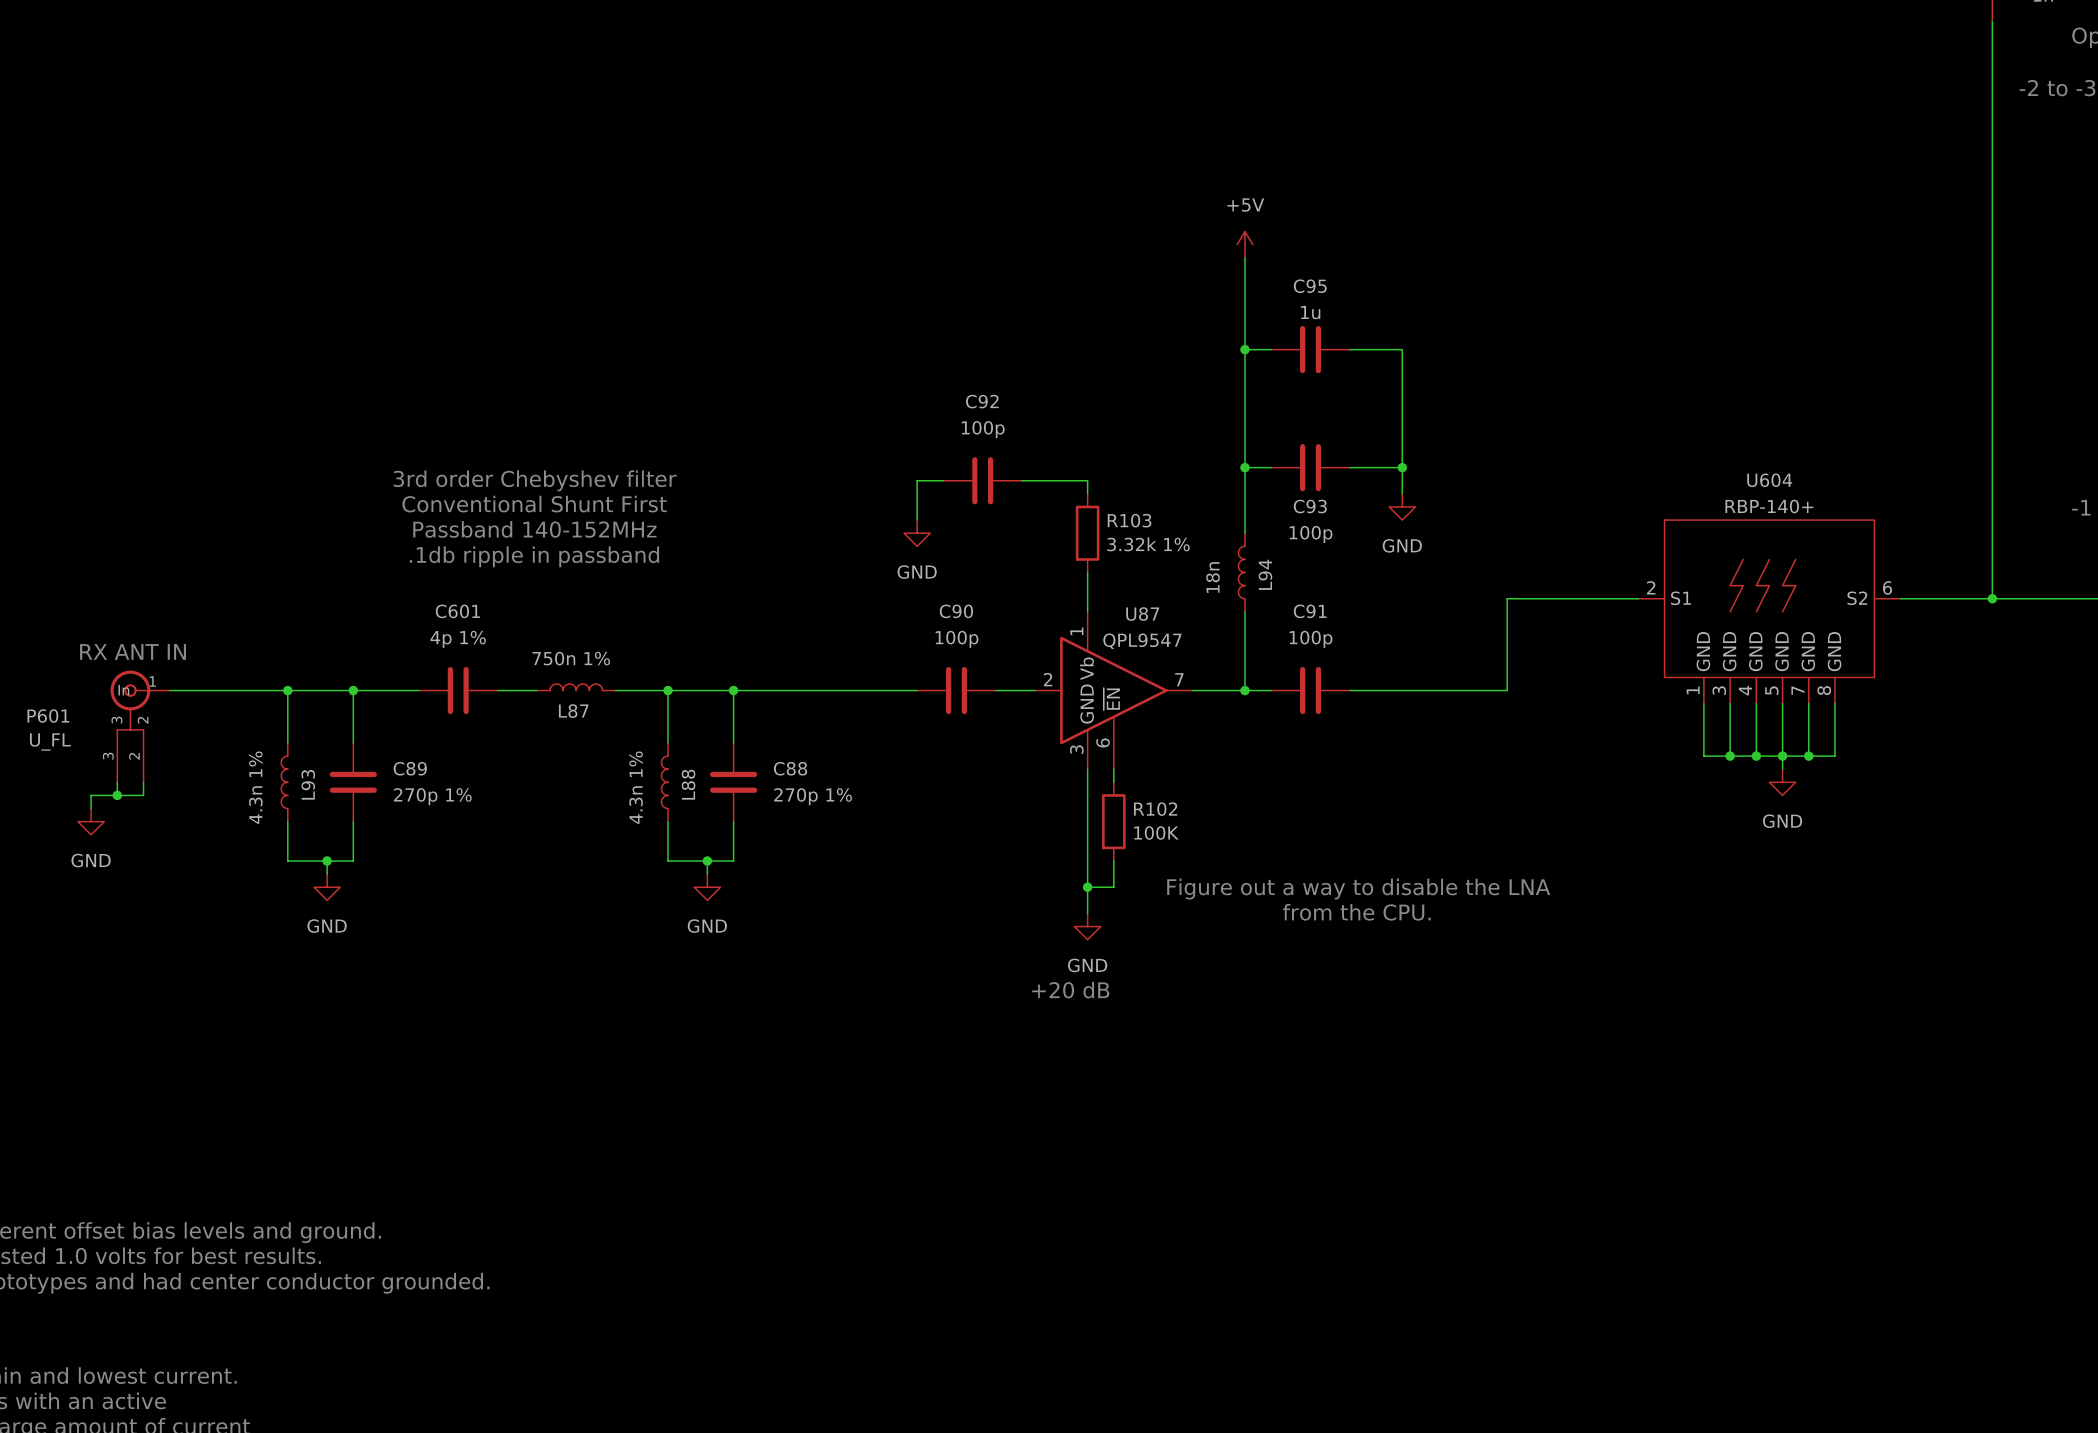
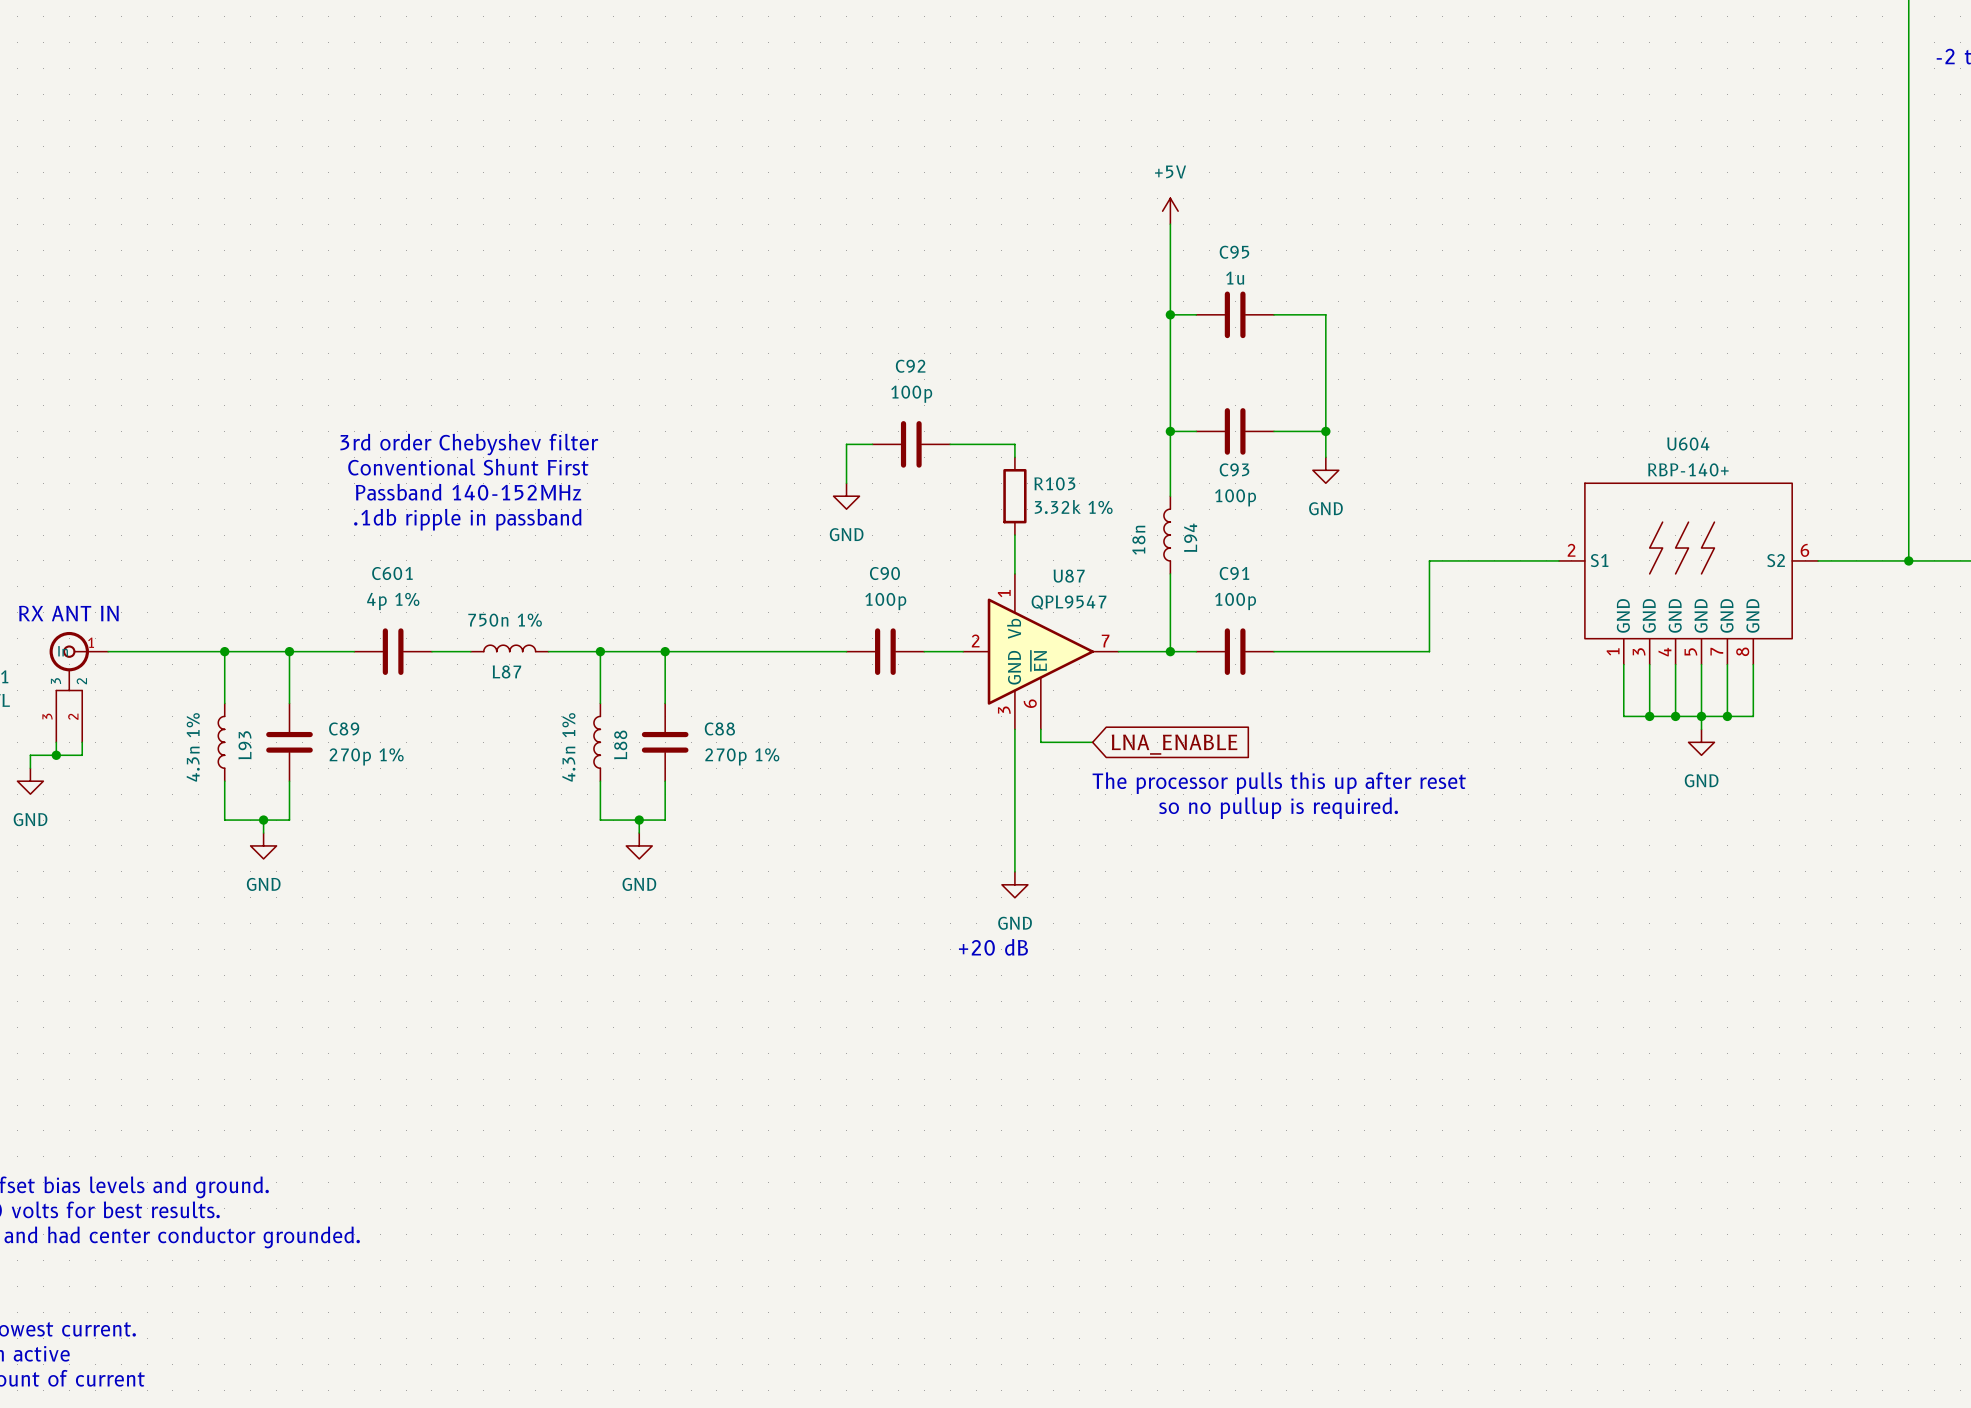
wire: none -> (1040, 742) (1092, 742)
global label: none -> LNA_ENABLE (1174, 744)
R102: 100K (1113, 821) -> none
text: none -> The processor pulls this up after reset (1279, 783)
text: none -> so no pullup is required. (1278, 808)
wire: (1113, 861) (1113, 887) (1087, 887) -> none
junction: (1087, 887) -> none
text: Figure out a way to disable the LNA (1358, 889) -> none
text: from the CPU. (1356, 912) -> none

